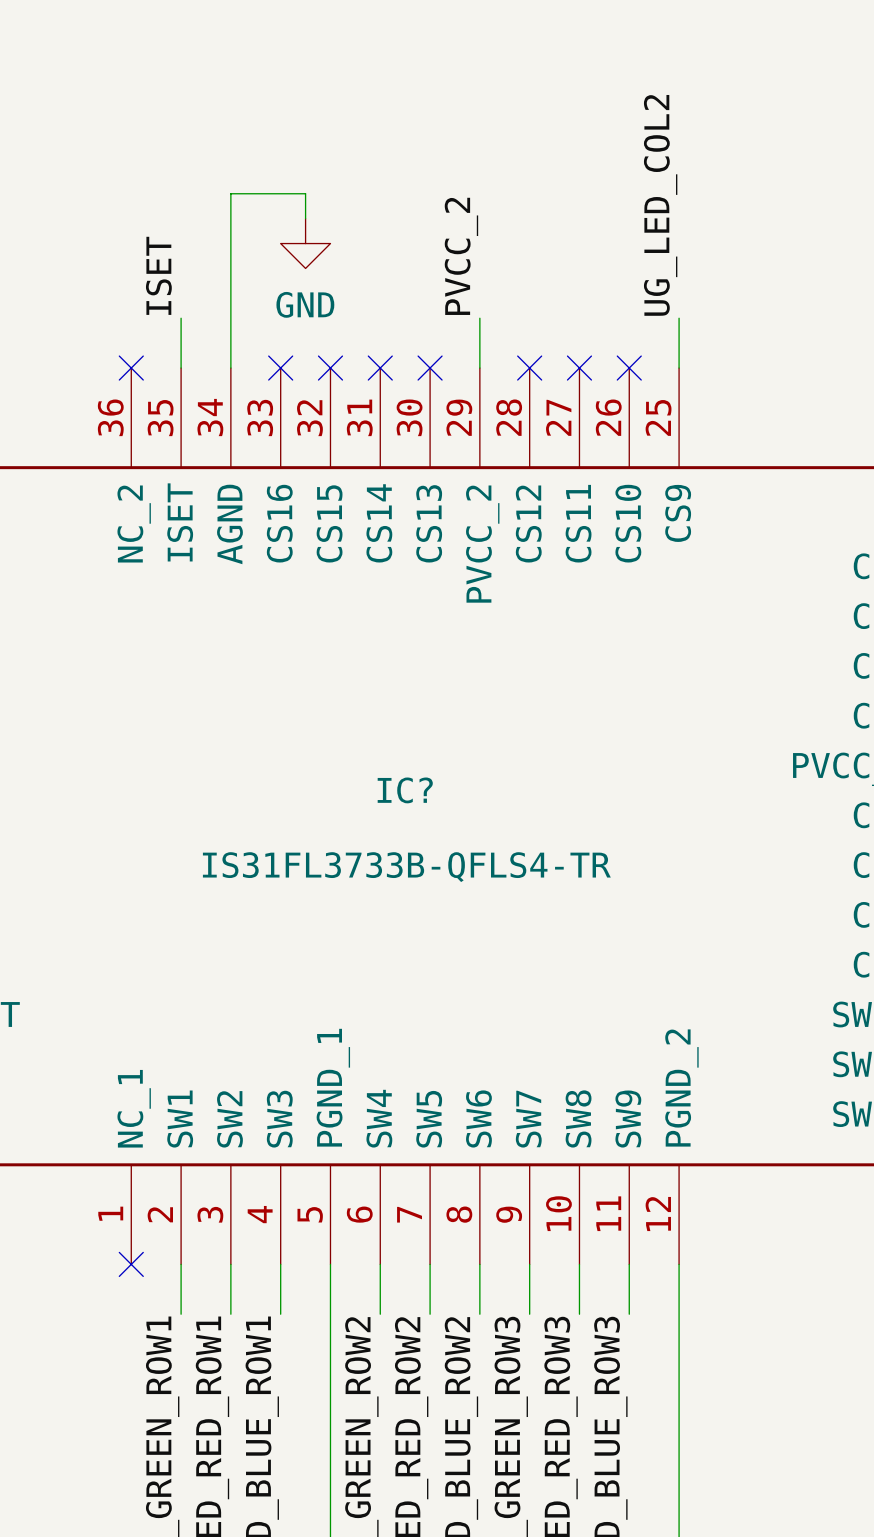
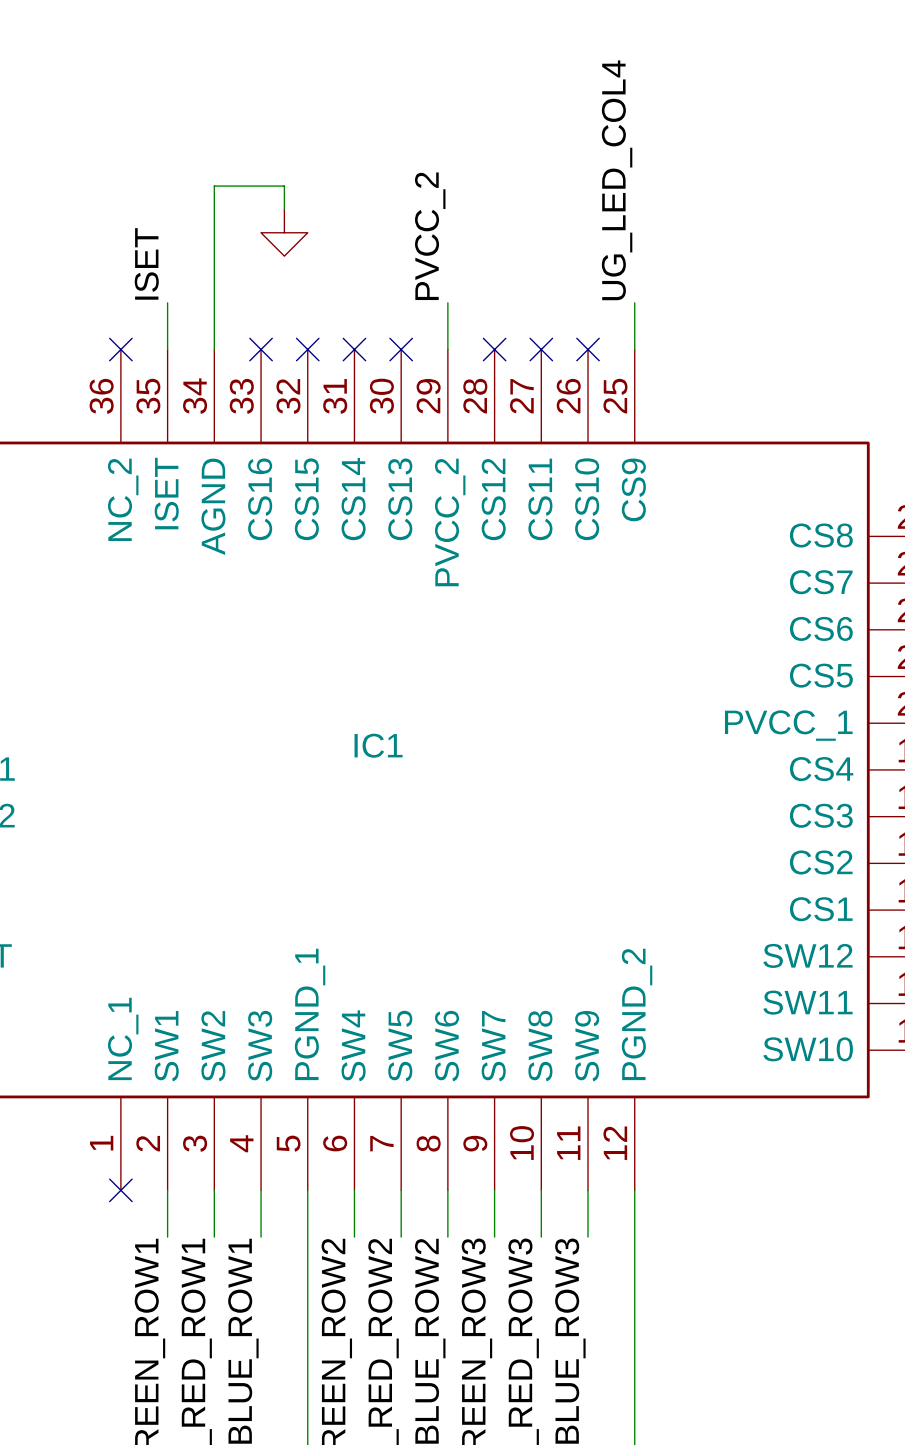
label: UG_LED_COL2 (660, 205) -> UG_LED_COL4 (617, 180)
power symbol text: GND (305, 304) -> none
IC? name: IC? (405, 790) -> IC1 (378, 745)
IC? value: IS31FL3733B-QFLS4-TR (406, 867) -> none

